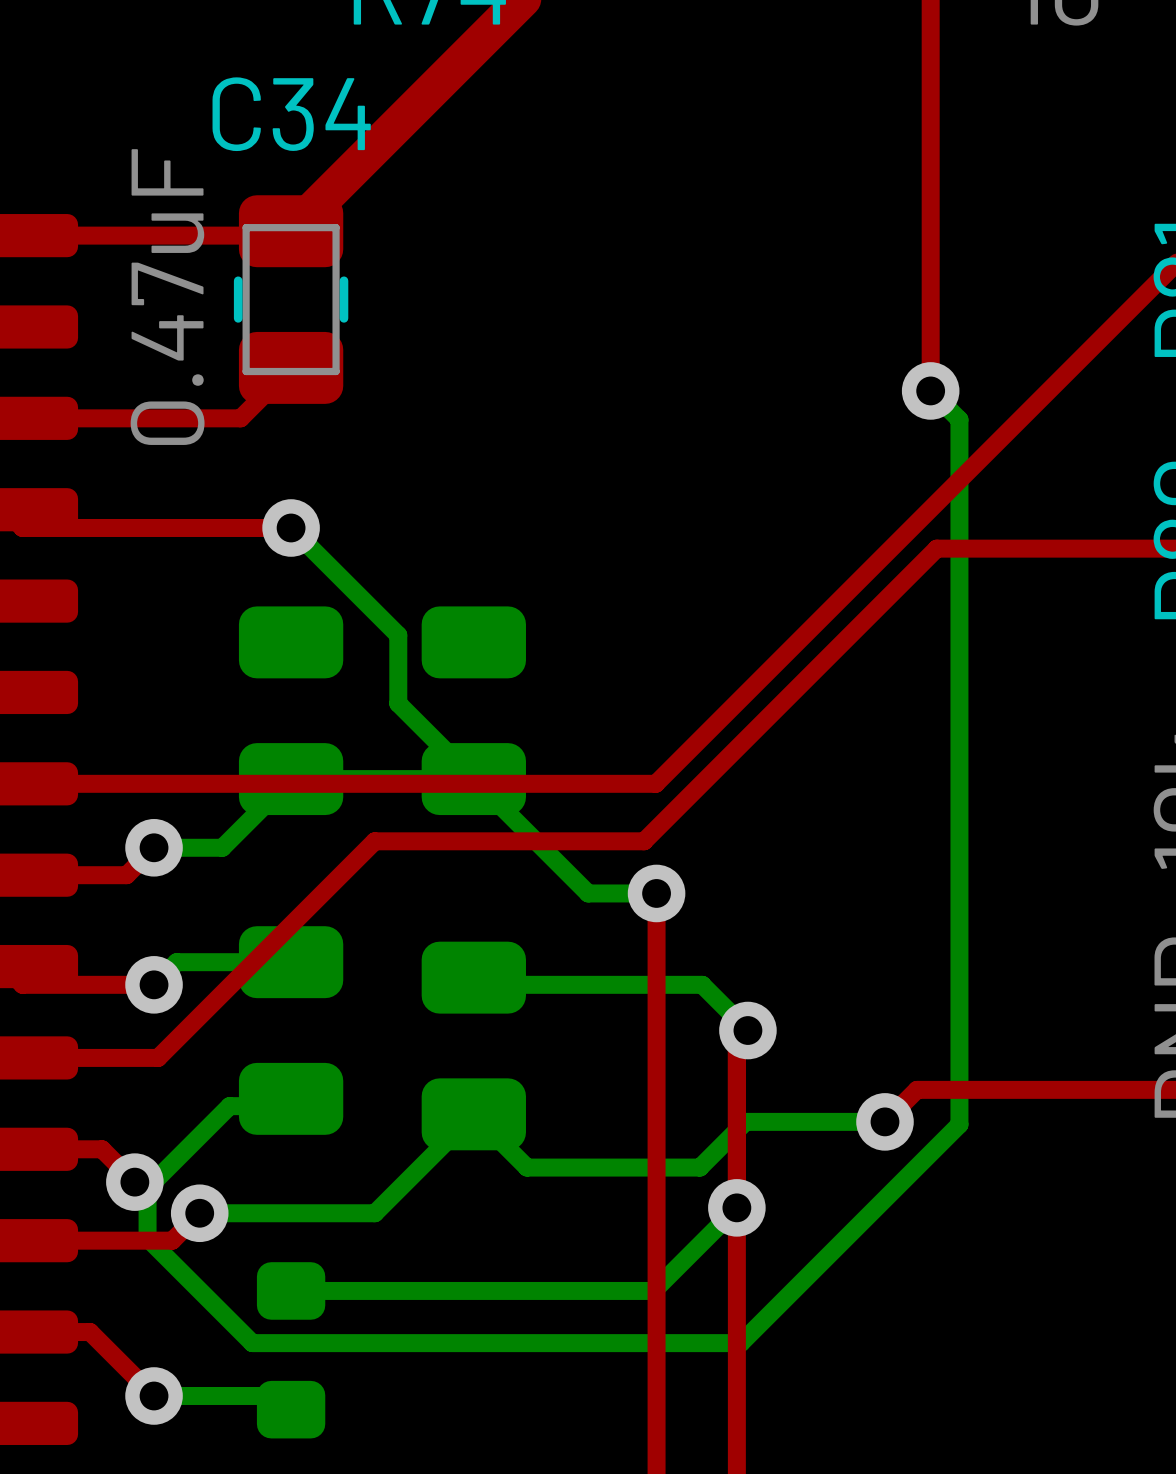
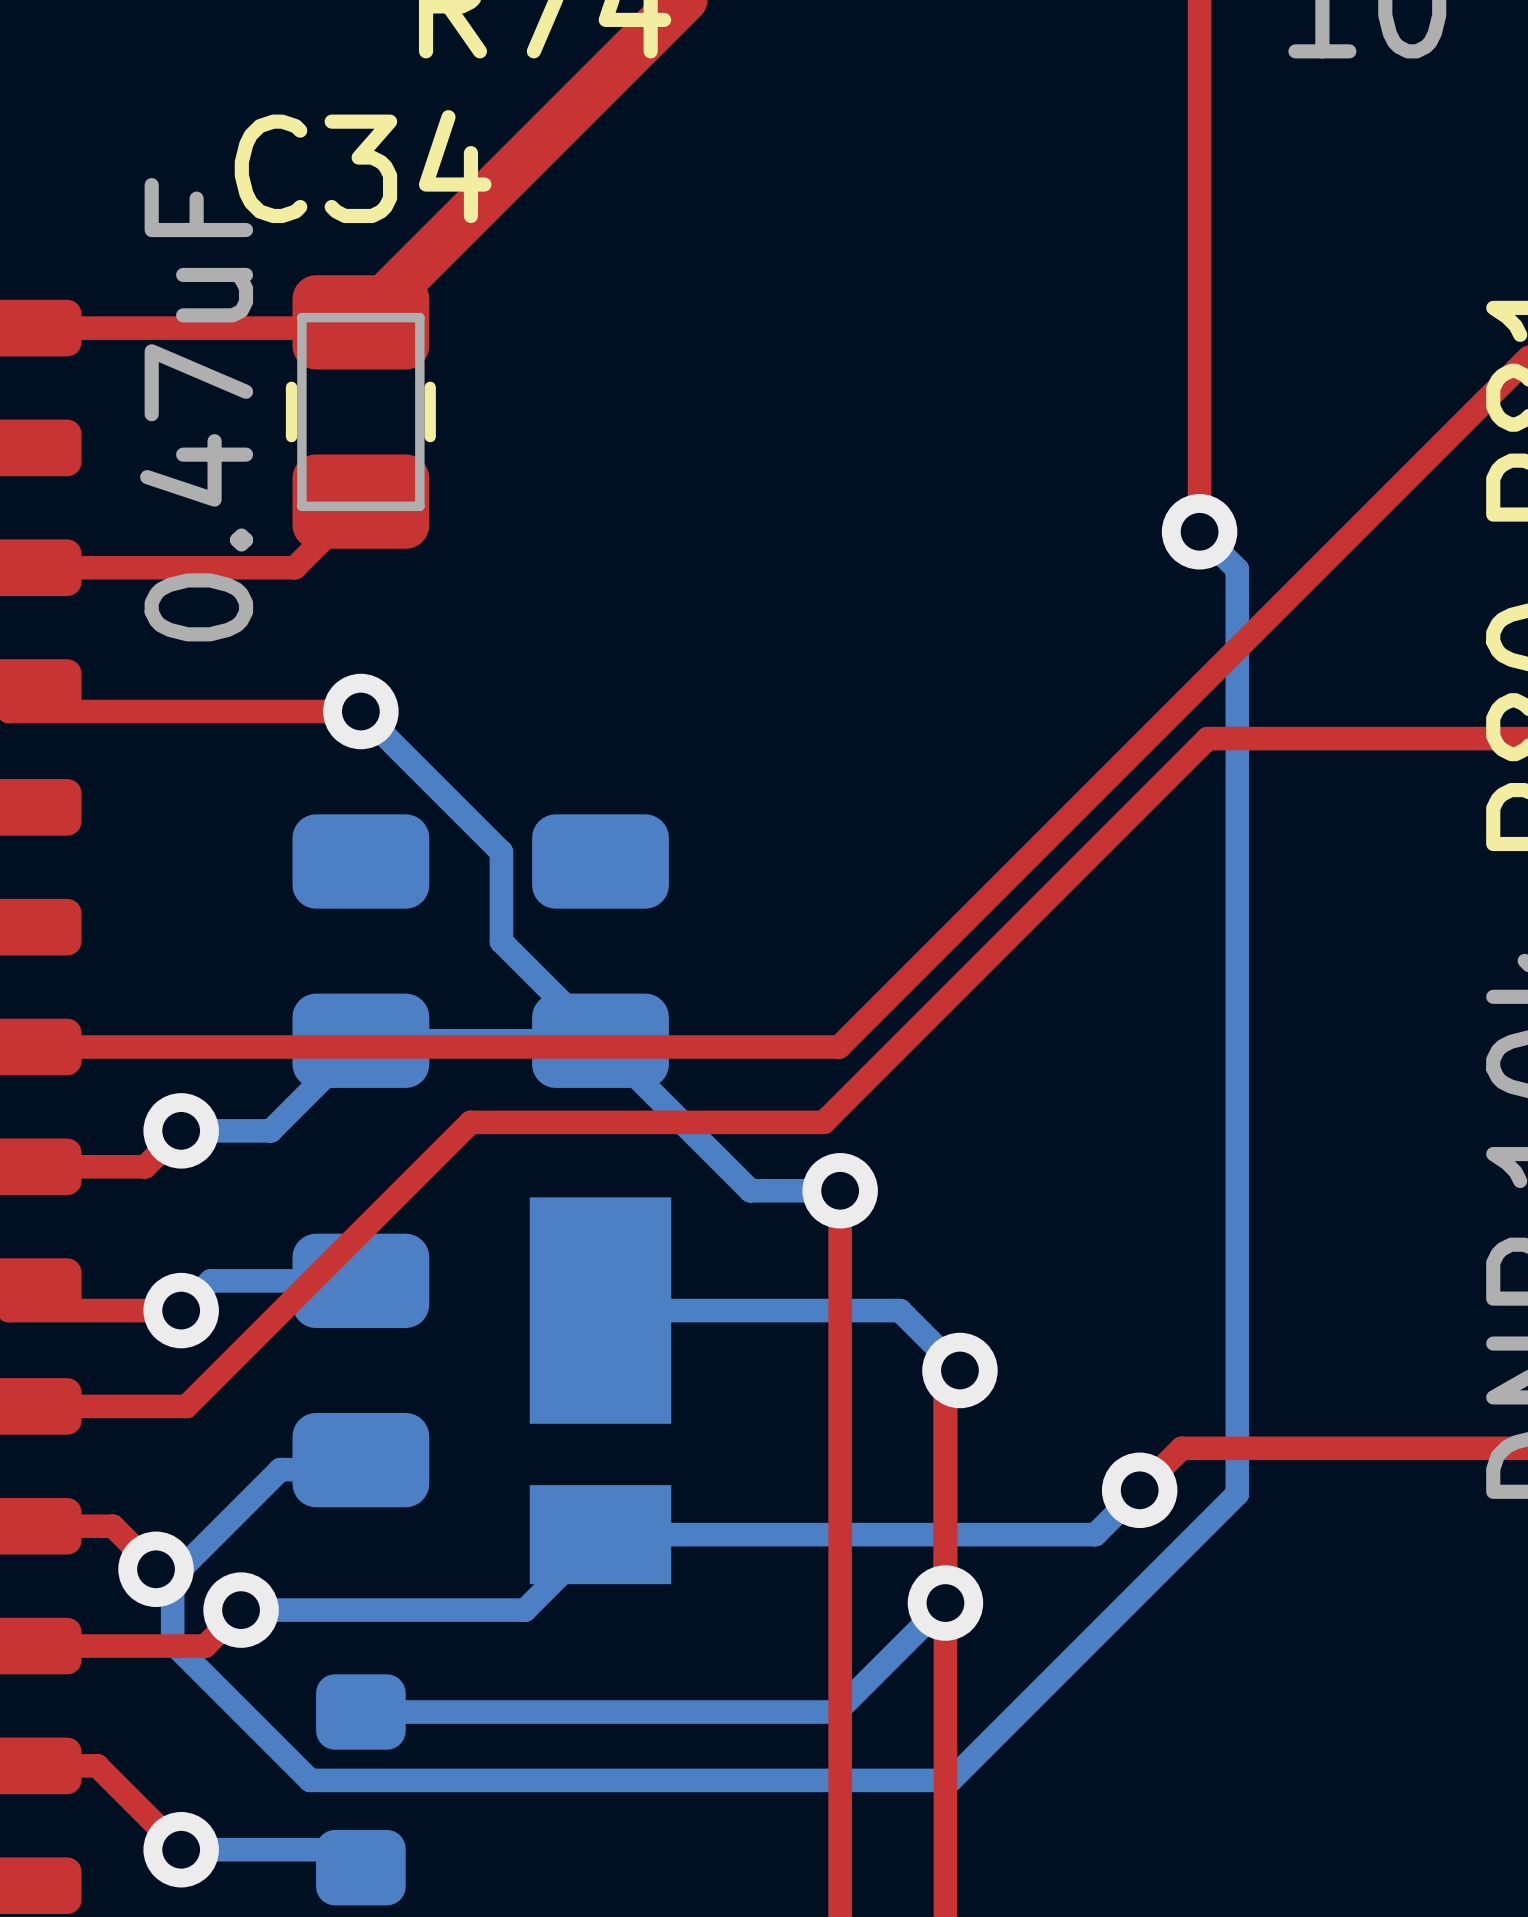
part footprint: [421, 941, 526, 1151] -> [529, 1197, 672, 1585]
bottom track: (884, 1121) (745, 1121) (699, 1167) (527, 1167) (473, 1114) (374, 1213) -> (1139, 1490) (1095, 1534) (600, 1534) (525, 1610) (470, 1610)

